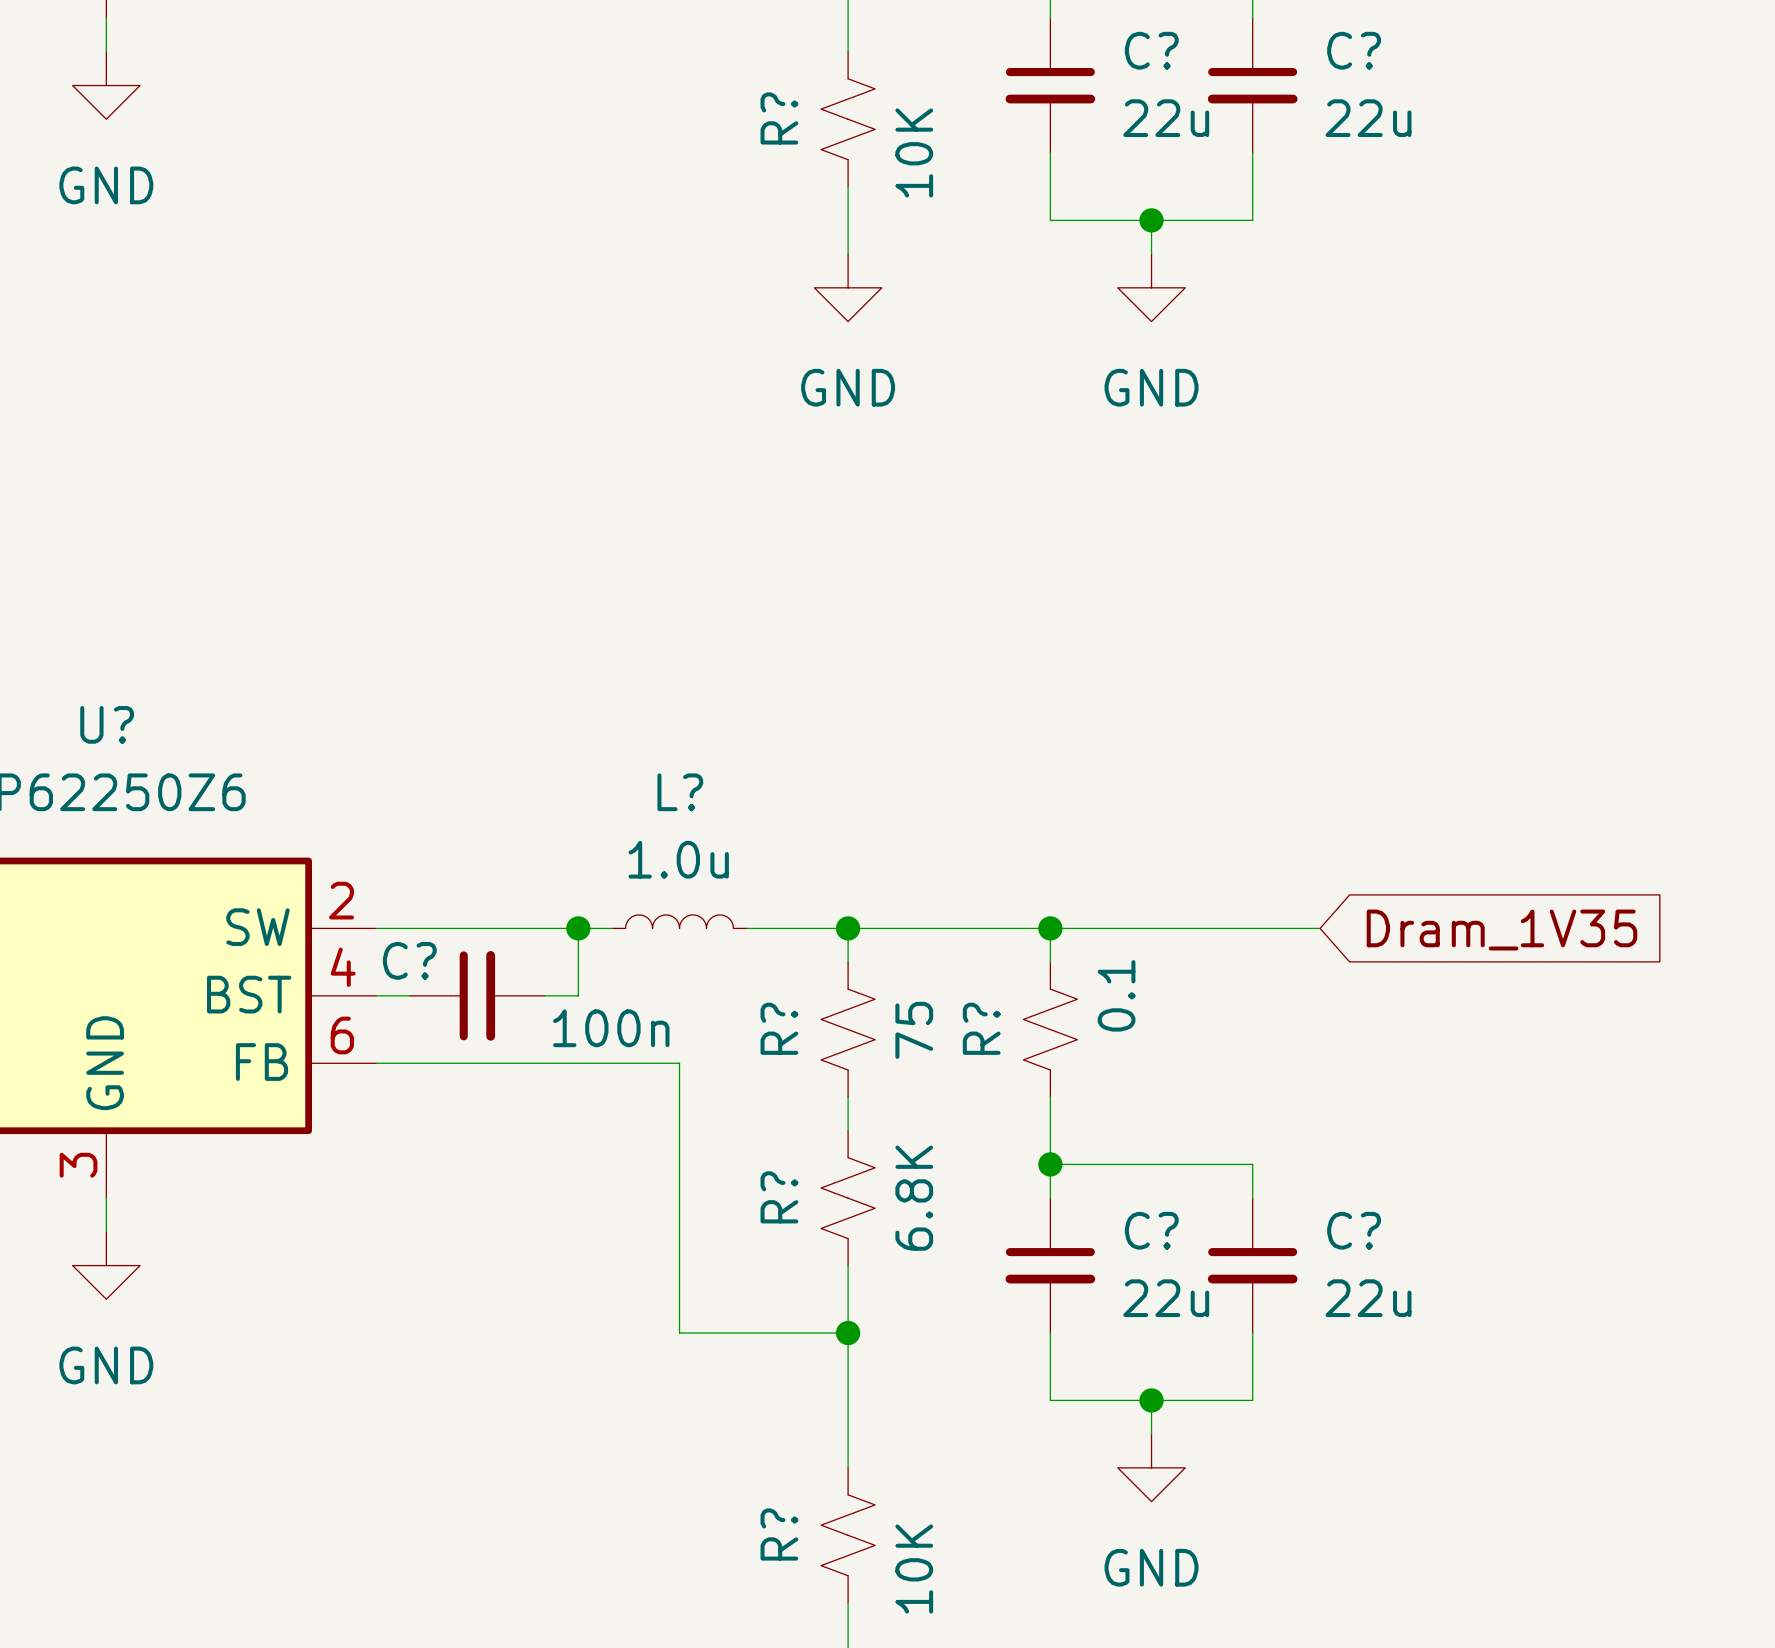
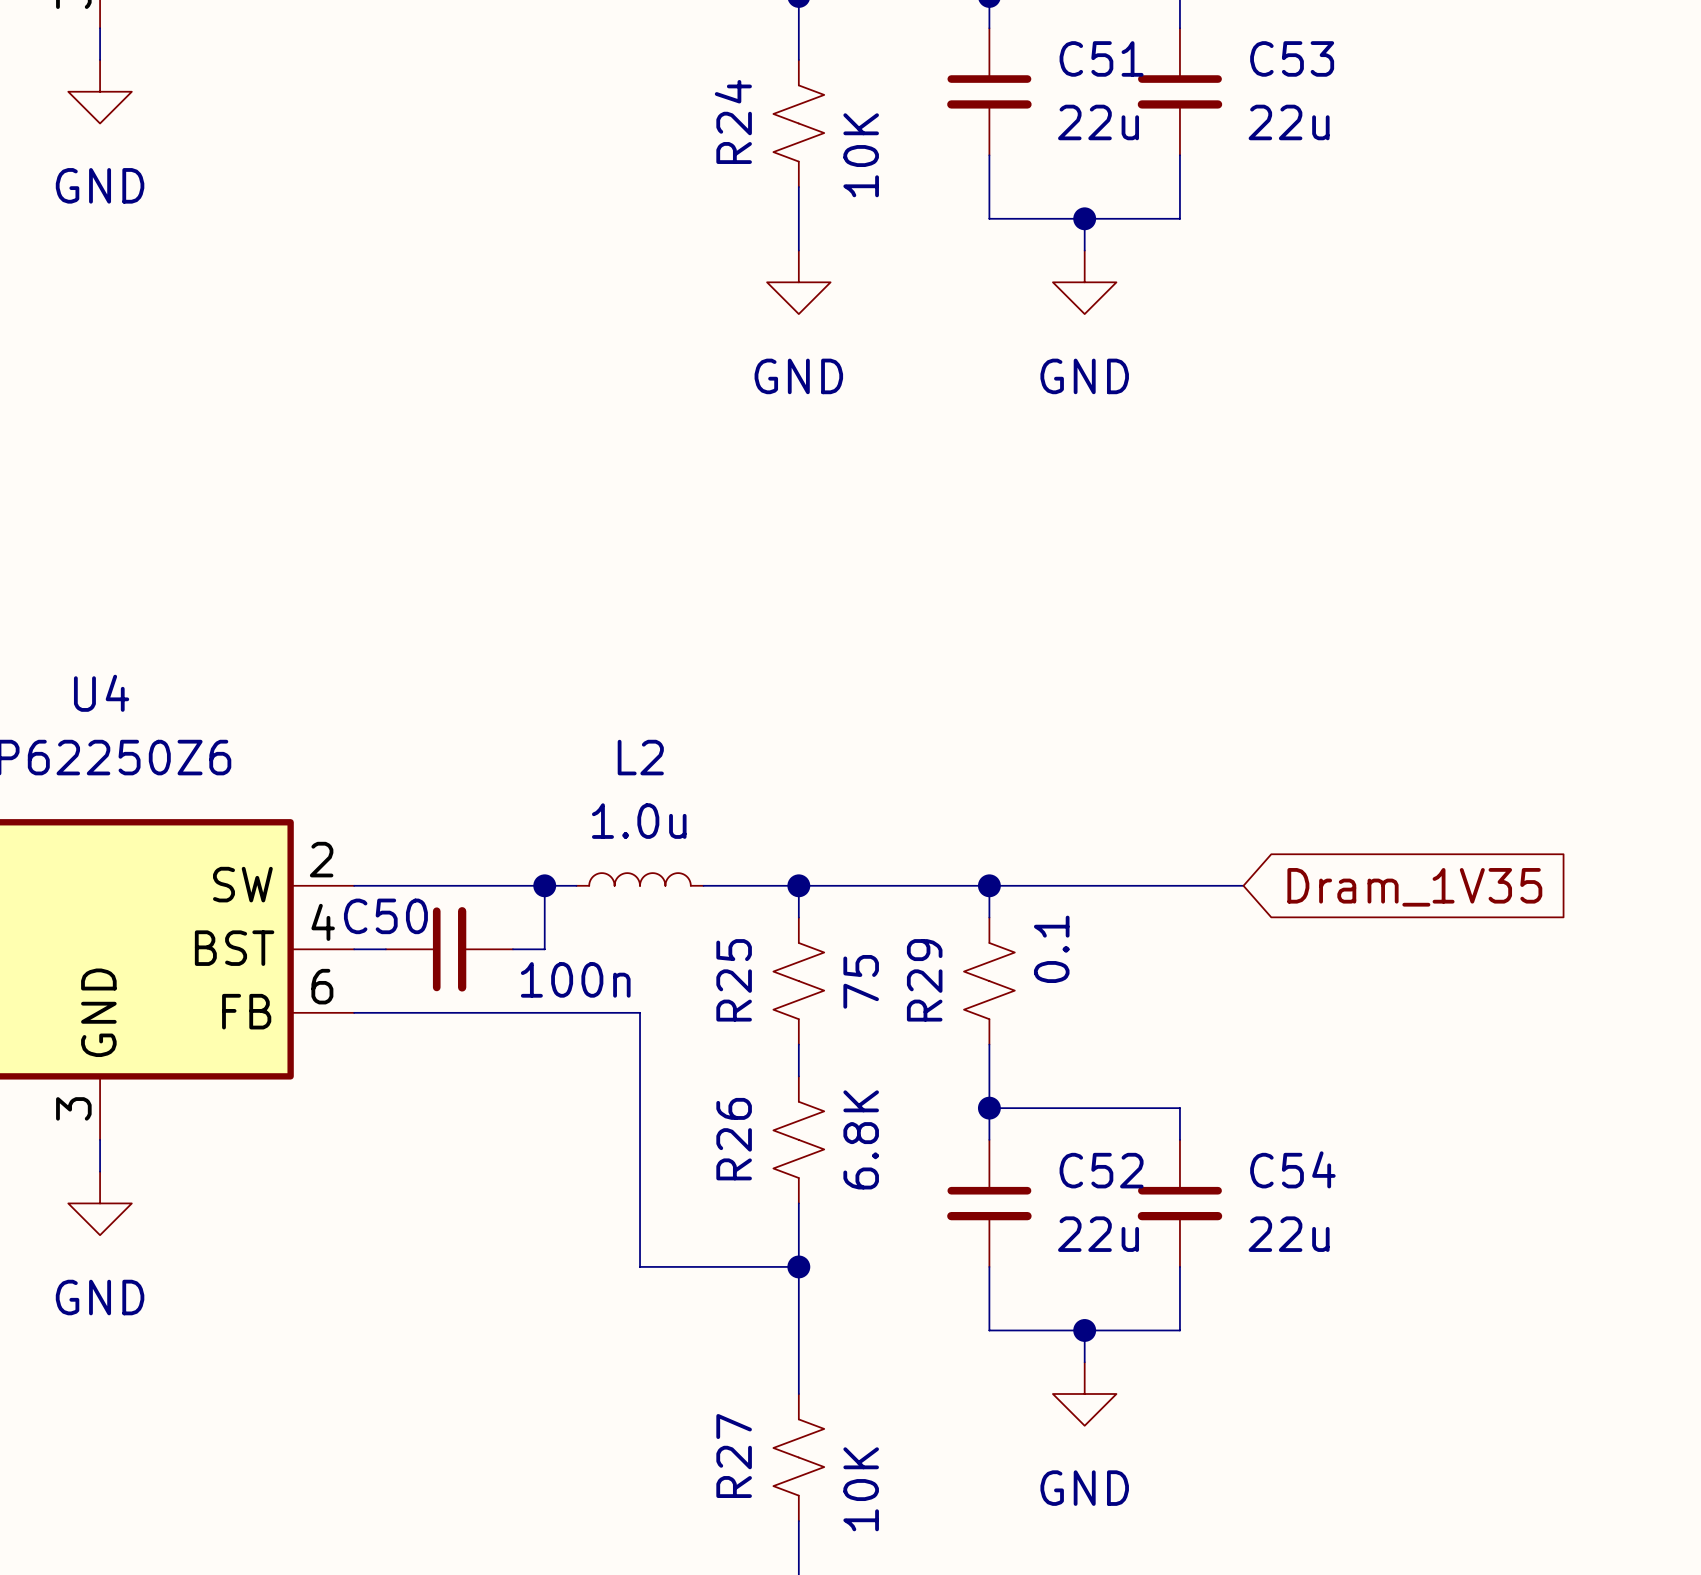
C? name: C? (1151, 50) -> C51 (1101, 58)
C? name: C? (1354, 50) -> C53 (1292, 58)
R? name: R? (779, 118) -> R24 (733, 121)
U? name: U? (107, 724) -> U4 (101, 693)
L? name: L? (680, 792) -> L2 (640, 757)
C? name: C? (409, 960) -> C50 (385, 916)
R? name: R? (779, 1028) -> R25 (734, 980)
R? name: R? (981, 1028) -> R29 (924, 980)
R? name: R? (779, 1197) -> R26 (734, 1139)
C? name: C? (1151, 1230) -> C52 (1101, 1170)
C? name: C? (1354, 1230) -> C54 (1292, 1169)
R? name: R? (779, 1534) -> R27 (734, 1456)

